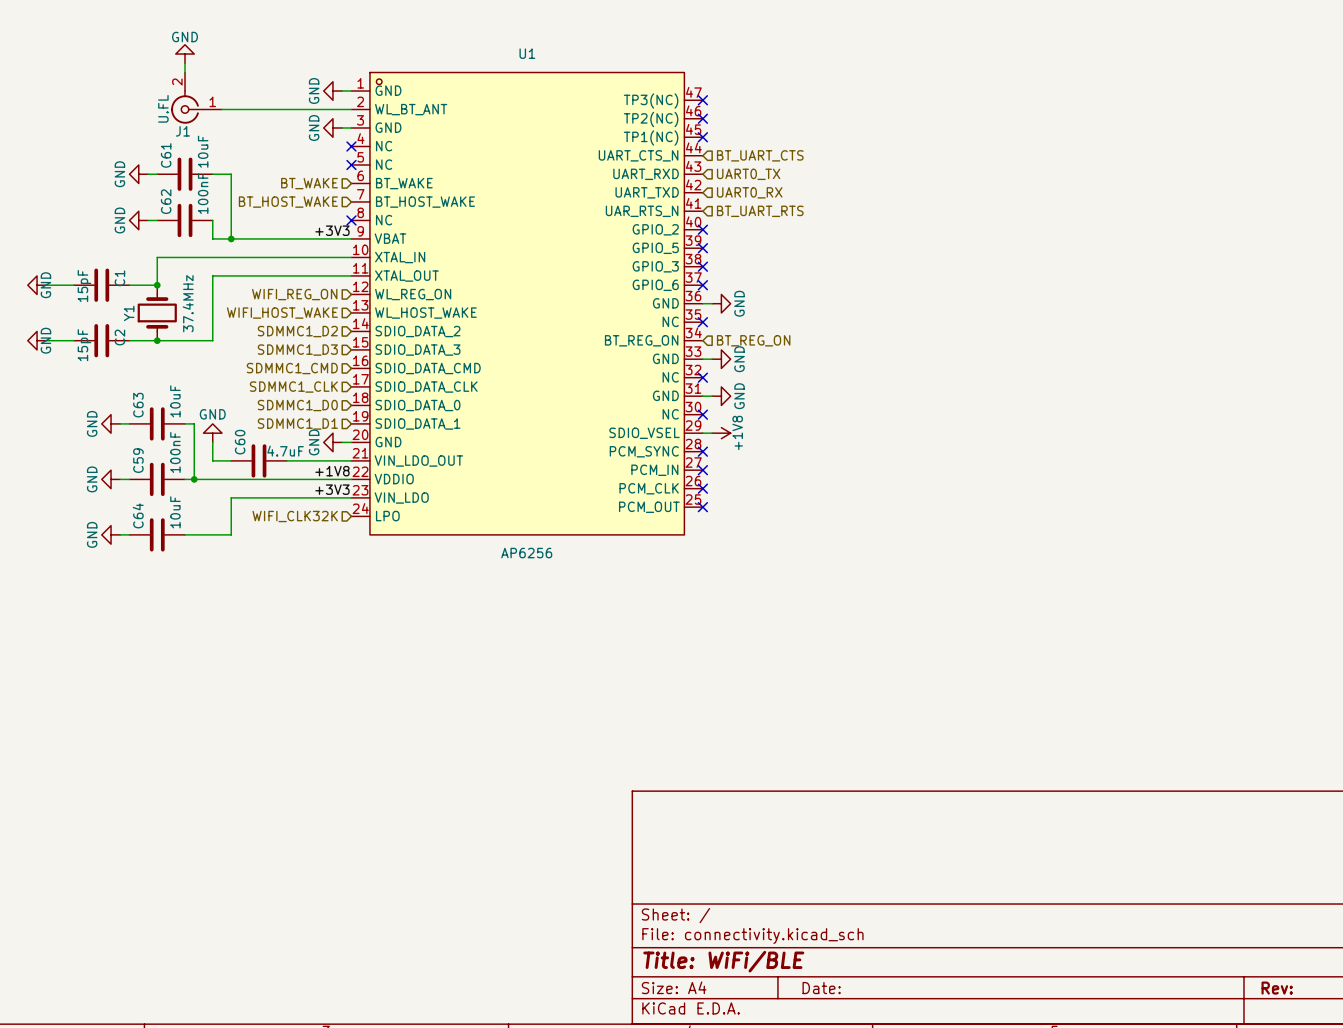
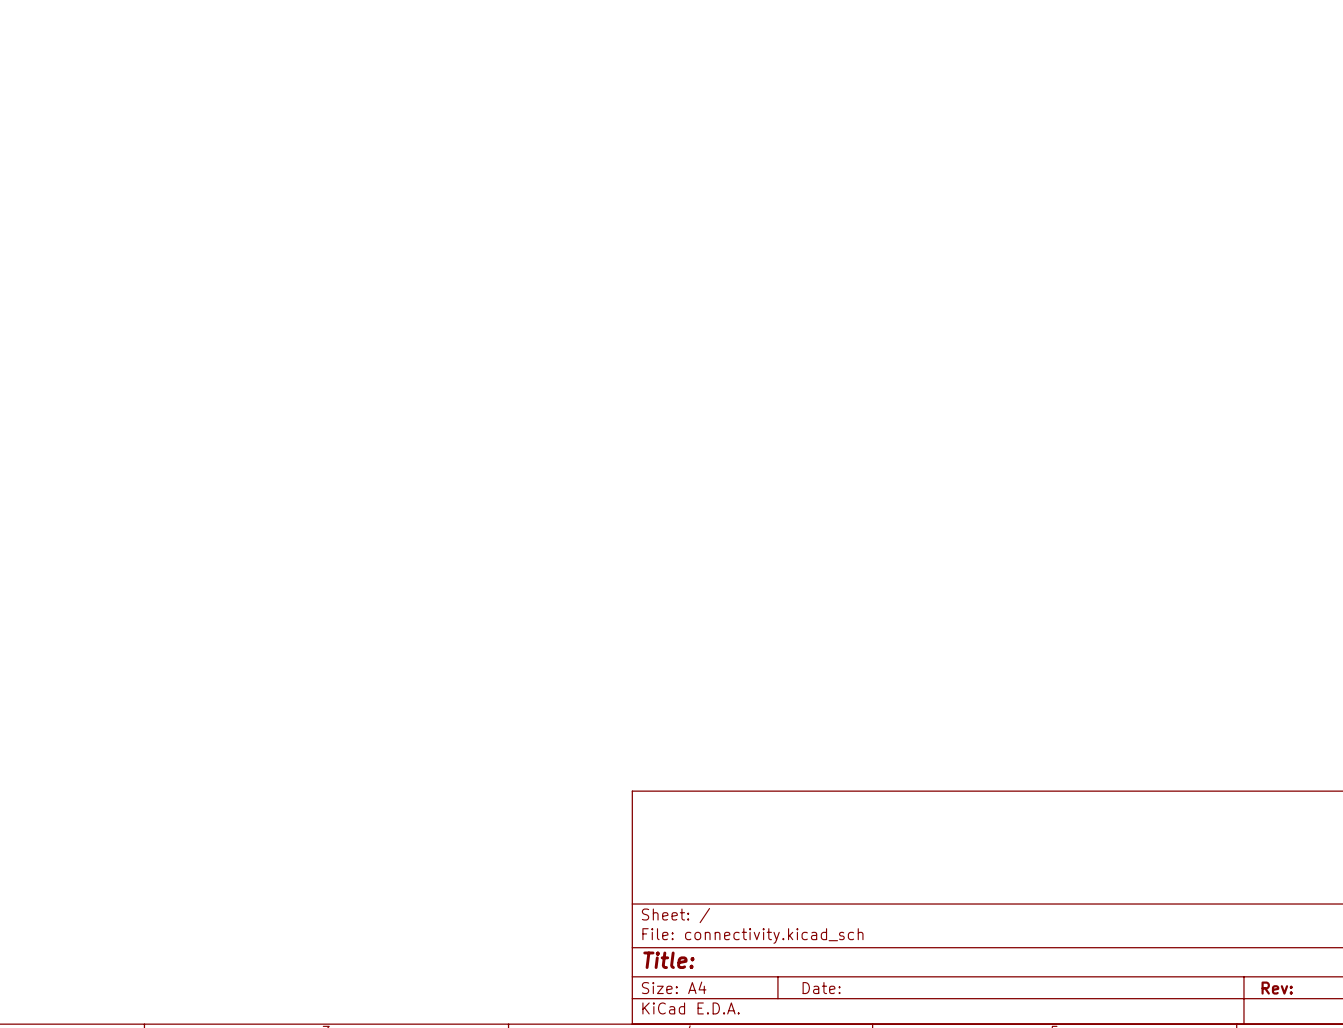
power symbol: GND (185, 54) -> none
wire: (185, 63) (185, 72) -> none
power symbol: GND (332, 91) -> none
wire: (342, 91) (351, 91) -> none
J1: U.FL (196, 98) -> none
no-connect mark: (702, 100) -> none
wire: (222, 109) (351, 109) -> none
no-connect mark: (702, 118) -> none
power symbol: GND (332, 127) -> none
wire: (342, 127) (351, 127) -> none
no-connect mark: (702, 137) -> none
no-connect mark: (351, 146) -> none
hierarchical label: BT_UART_CTS (760, 155) -> none
no-connect mark: (351, 164) -> none
power symbol: GND (138, 174) -> none
wire: (148, 174) (157, 174) -> none
C61: 10uF (185, 174) -> none
wire: (212, 174) (231, 174) (231, 238) -> none
hierarchical label: UART0_TX (748, 174) -> none
hierarchical label: BT_WAKE (309, 183) -> none
hierarchical label: UART0_RX (749, 192) -> none
hierarchical label: BT_HOST_WAKE (288, 202) -> none
hierarchical label: BT_UART_RTS (760, 211) -> none
power symbol: GND (138, 220) -> none
wire: (148, 220) (157, 220) -> none
C62: 100nF (185, 220) -> none
wire: (212, 220) (212, 238) (351, 238) -> none
no-connect mark: (351, 220) -> none
no-connect mark: (702, 229) -> none
label: +3V3 (332, 230) -> none
junction: (231, 238) -> none
no-connect mark: (702, 248) -> none
wire: (351, 257) (157, 257) (157, 285) (129, 285) -> none
no-connect mark: (702, 266) -> none
wire: (351, 275) (212, 275) (212, 340) (129, 340) -> none
power symbol: GND (37, 285) -> none
wire: (46, 285) (74, 285) -> none
C1: 15pF (101, 285) -> none
junction: (157, 285) -> none
no-connect mark: (702, 285) -> none
hierarchical label: WIFI_REG_ON (294, 294) -> none
U1: AP6256 (527, 303) -> none
wire: (702, 303) (712, 303) -> none
power symbol: GND (721, 303) -> none
Y1: 37.4MHz (157, 312) -> none
hierarchical label: WIFI_HOST_WAKE (282, 313) -> none
no-connect mark: (702, 322) -> none
hierarchical label: SDMMC1_D2 (297, 331) -> none
power symbol: GND (37, 340) -> none
wire: (46, 340) (74, 340) -> none
C2: 15pF (101, 340) -> none
junction: (157, 340) -> none
hierarchical label: BT_REG_ON (753, 340) -> none
hierarchical label: SDMMC1_D3 (297, 350) -> none
wire: (702, 359) (712, 359) -> none
power symbol: GND (721, 359) -> none
hierarchical label: SDMMC1_CMD (292, 368) -> none
no-connect mark: (702, 377) -> none
hierarchical label: SDMMC1_CLK (293, 387) -> none
wire: (702, 396) (712, 396) -> none
power symbol: GND (721, 396) -> none
hierarchical label: SDMMC1_D0 (297, 405) -> none
no-connect mark: (702, 414) -> none
power symbol: GND (111, 423) -> none
wire: (120, 423) (129, 423) -> none
C63: 10uF (157, 423) -> none
wire: (185, 423) (194, 423) (194, 479) -> none
hierarchical label: SDMMC1_D1 (297, 424) -> none
power symbol: GND (212, 433) -> none
wire: (702, 433) (712, 433) -> none
power symbol: +1V8 (721, 433) -> none
wire: (212, 442) (212, 460) (231, 460) -> none
power symbol: GND (332, 442) -> none
wire: (342, 442) (351, 442) -> none
no-connect mark: (702, 451) -> none
C60: 4.7uF (258, 460) -> none
wire: (286, 460) (351, 460) -> none
no-connect mark: (702, 470) -> none
label: +1V8 (332, 471) -> none
power symbol: GND (111, 479) -> none
wire: (120, 479) (129, 479) -> none
C59: 100nF (157, 479) -> none
wire: (185, 479) (351, 479) -> none
junction: (194, 479) -> none
no-connect mark: (702, 488) -> none
label: +3V3 (332, 489) -> none
wire: (351, 497) (231, 497) (231, 534) (185, 534) -> none
no-connect mark: (702, 507) -> none
hierarchical label: WIFI_CLK32K (295, 516) -> none
power symbol: GND (111, 534) -> none
wire: (120, 534) (129, 534) -> none
C64: 10uF (157, 534) -> none
title block: Title: WiFi/BLE (723, 961) -> Title: (668, 960)

